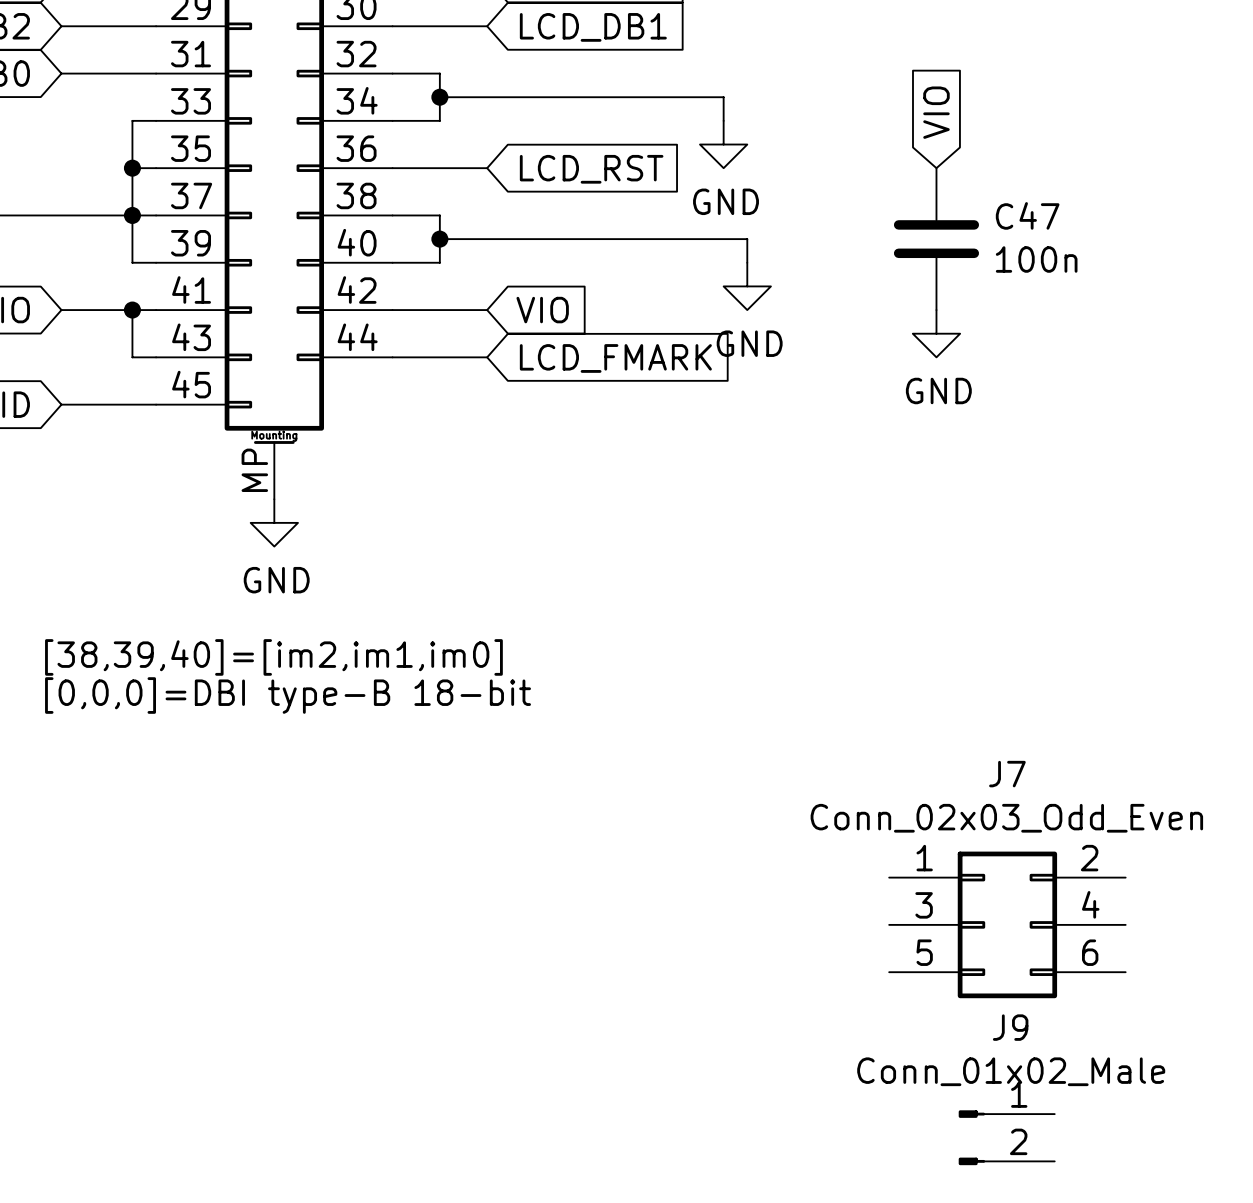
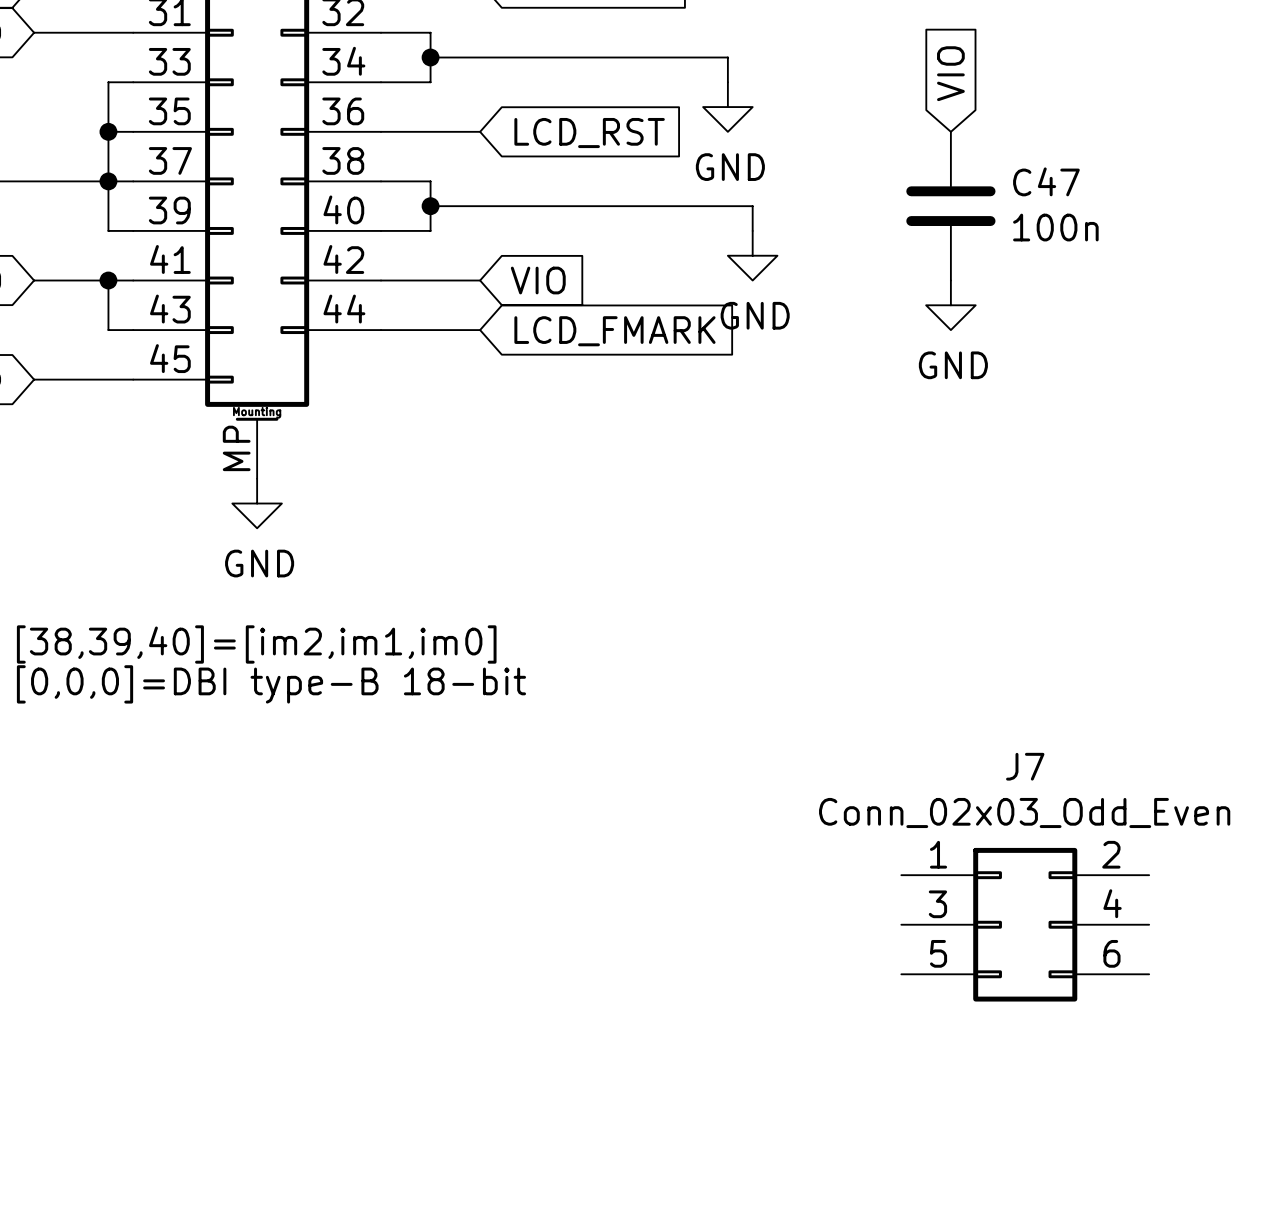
J9: Conn_01x02_Male (1006, 1137) -> none

